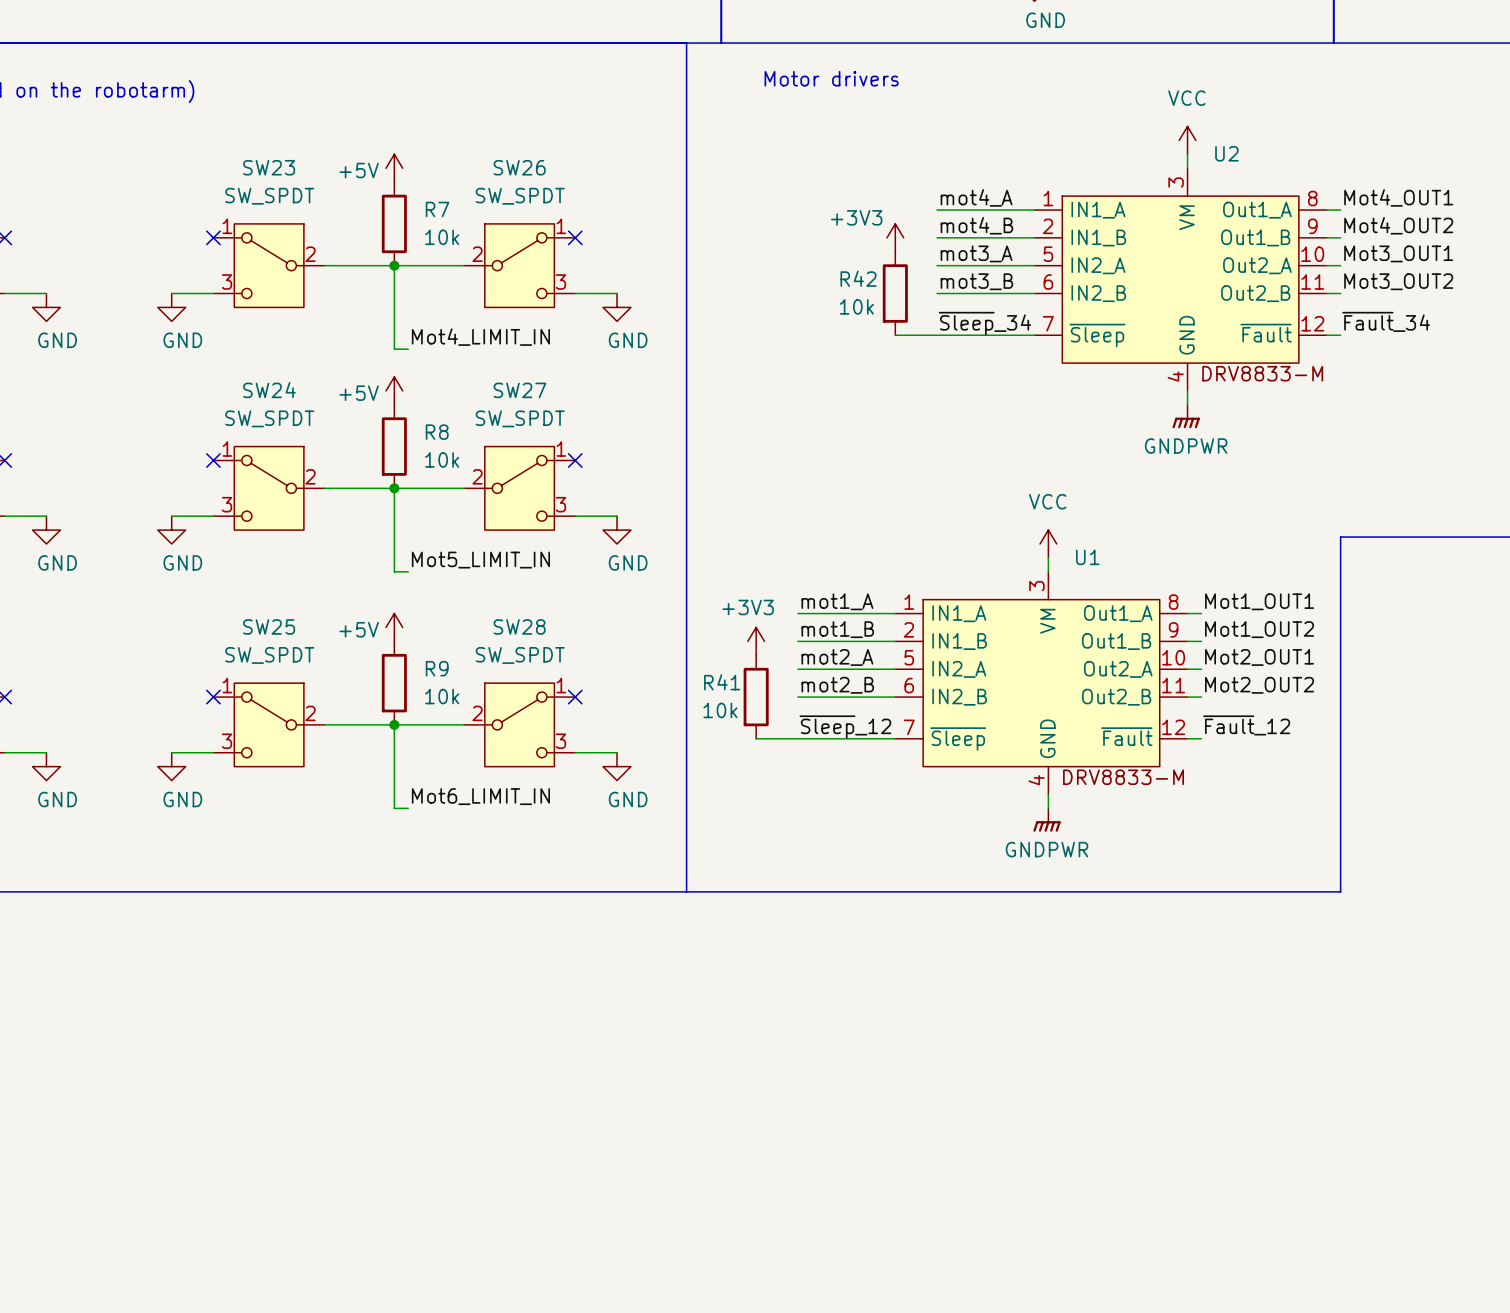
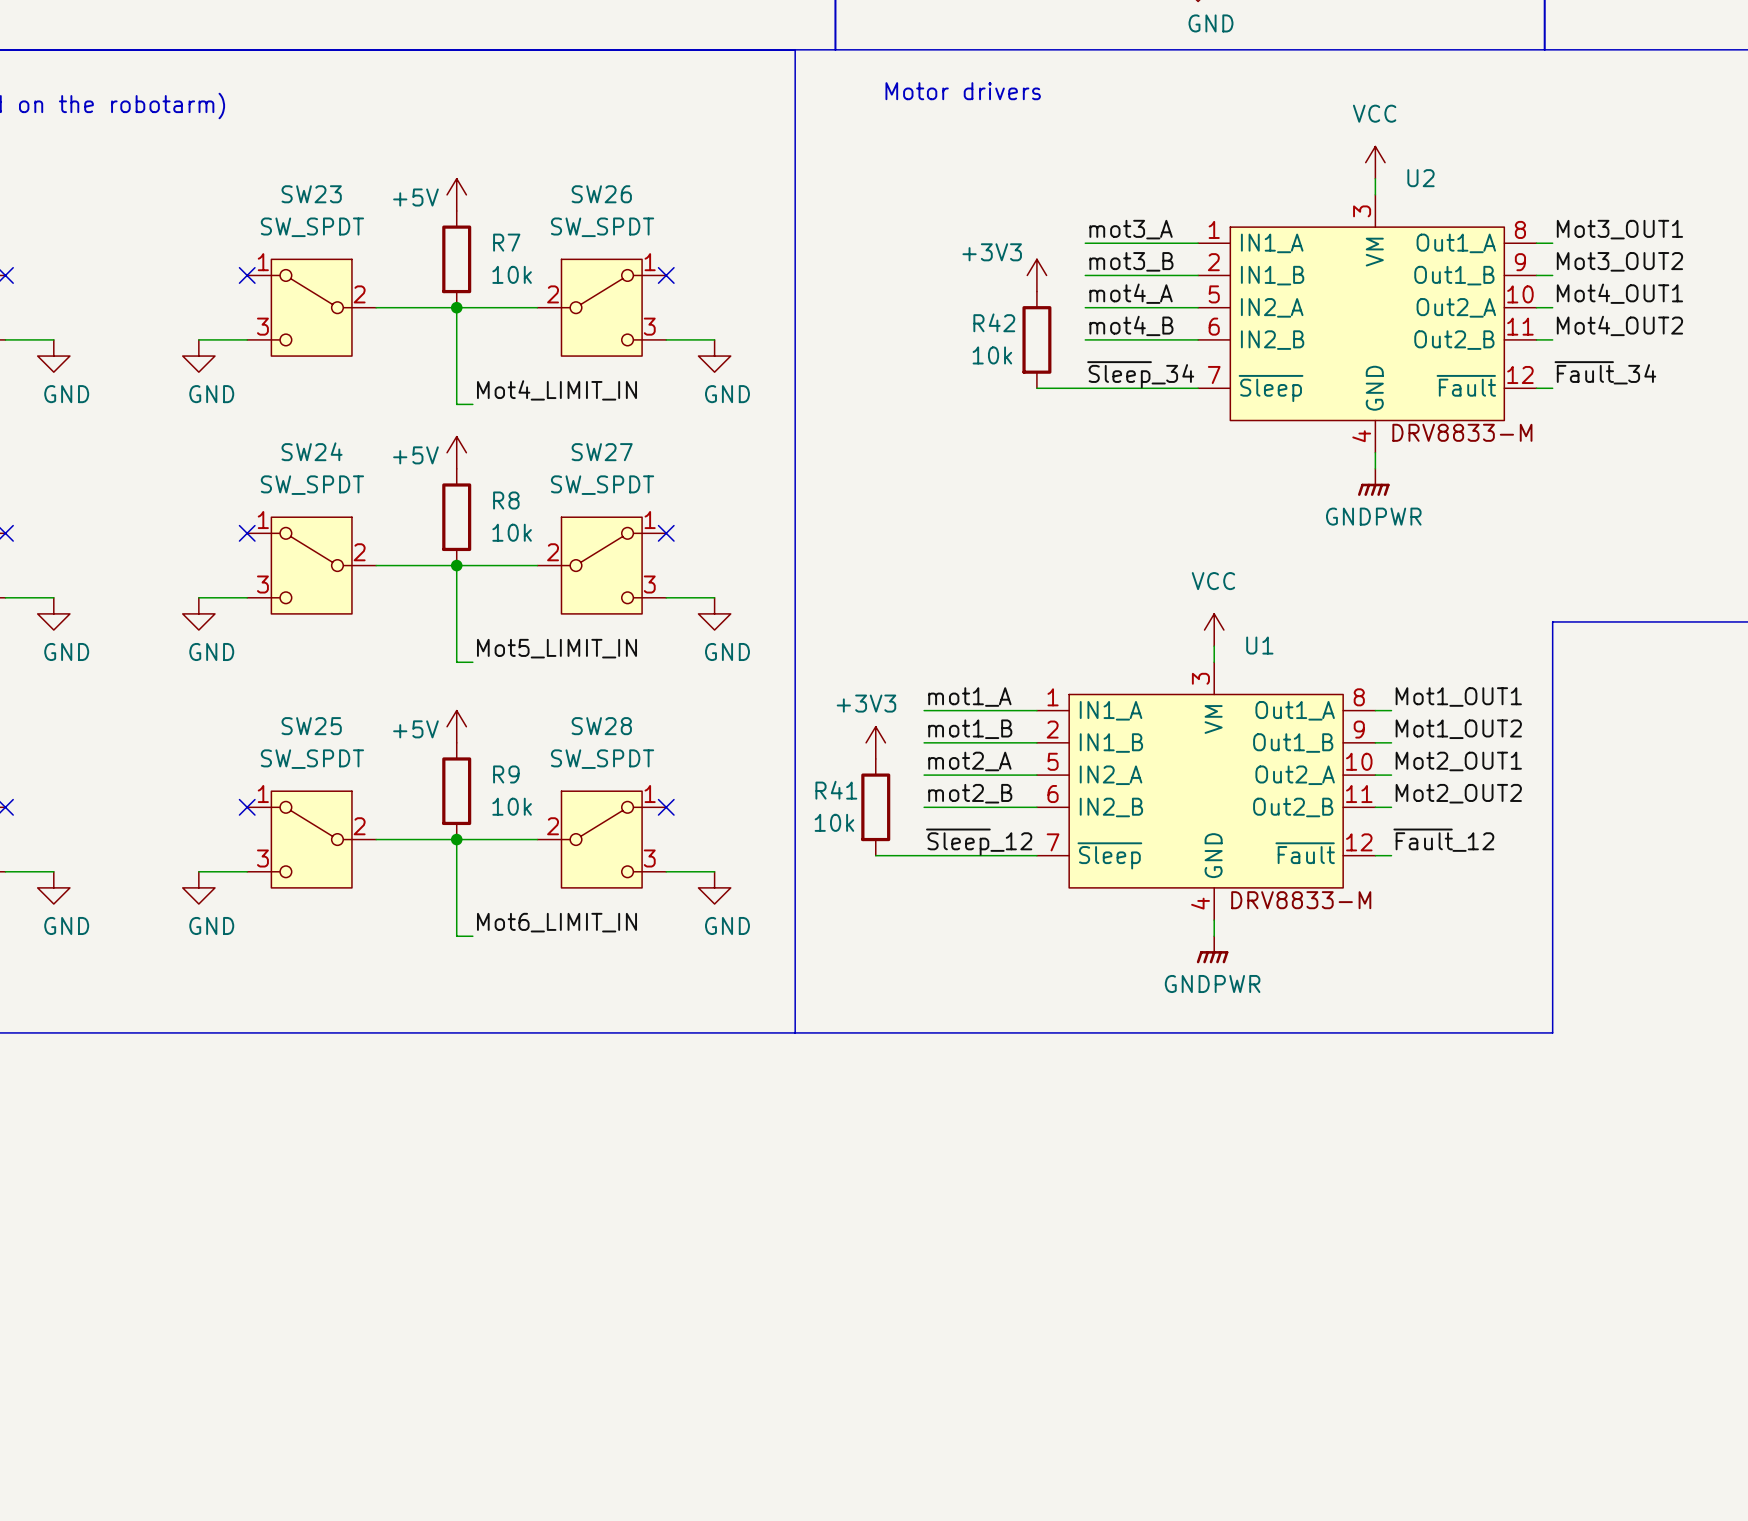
label: mot4_A (976, 197) -> mot3_A (1131, 229)
label: Mot4_OUT1 (1398, 197) -> Mot3_OUT1 (1619, 229)
label: mot4_B (976, 225) -> mot3_B (1131, 261)
label: Mot4_OUT2 (1398, 225) -> Mot3_OUT2 (1619, 261)
label: mot3_A (976, 253) -> mot4_A (1131, 293)
label: Mot3_OUT1 (1398, 253) -> Mot4_OUT1 (1619, 293)
label: mot3_B (976, 281) -> mot4_B (1131, 325)
label: Mot3_OUT2 (1398, 281) -> Mot4_OUT2 (1619, 325)

